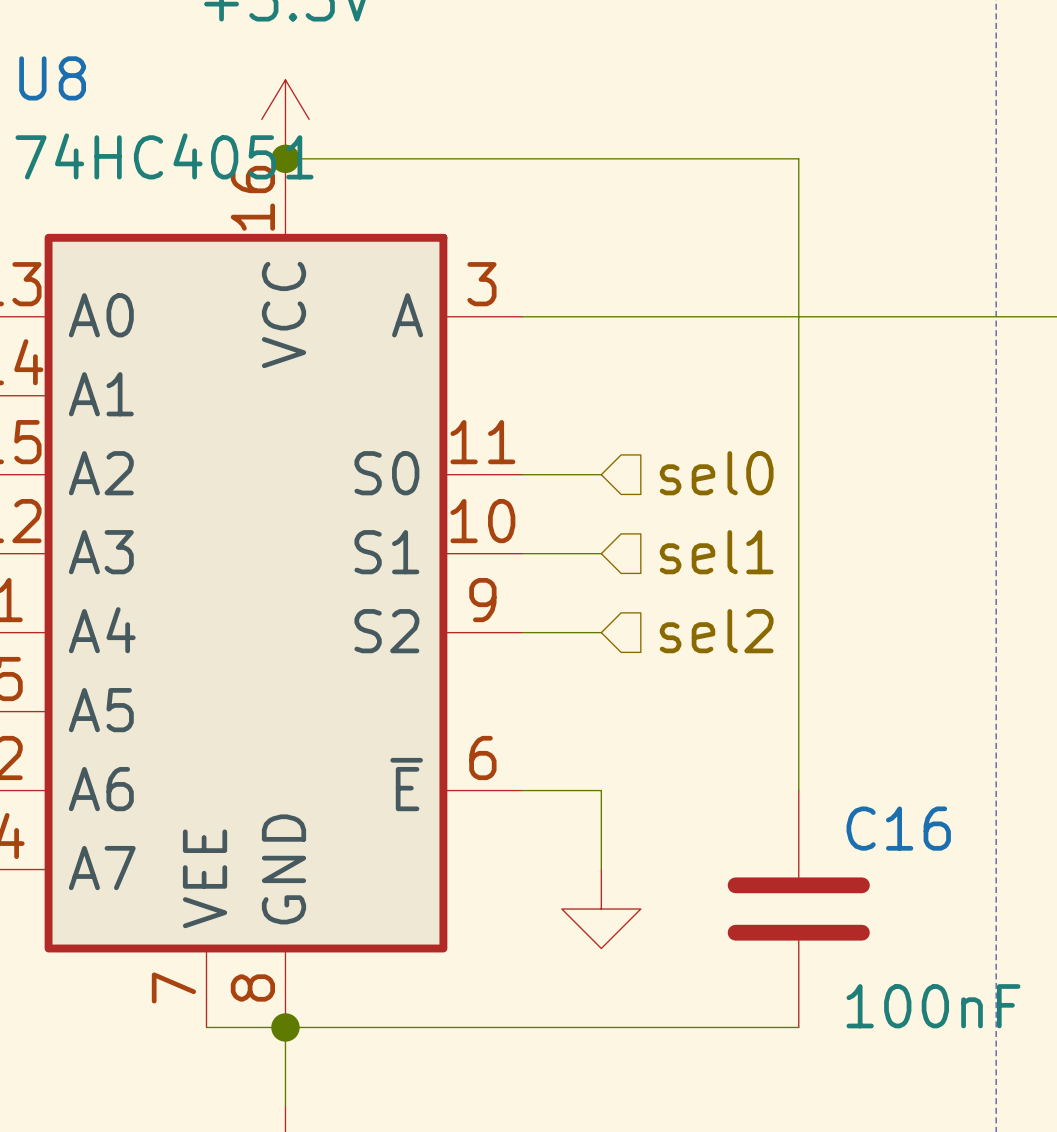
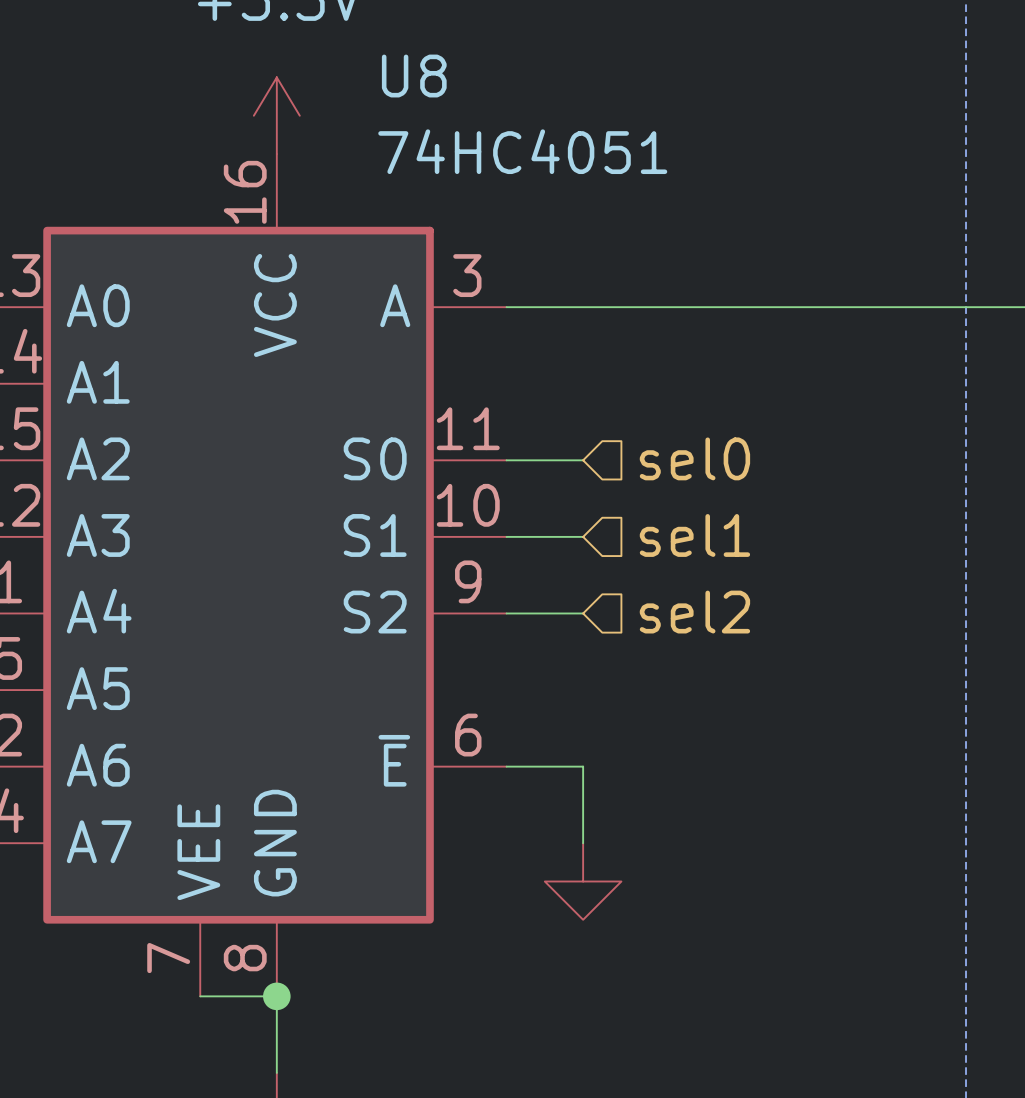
U8 name position: U8 (52, 78) -> U8 (414, 76)
U8 value position: 74HC4051 (164, 156) -> 74HC4051 (522, 151)
wire: (285, 158) (798, 158) (798, 790) -> none
junction: (285, 158) -> none
C16: 100nF (798, 909) -> none
wire: (285, 1027) (798, 1027) -> none

